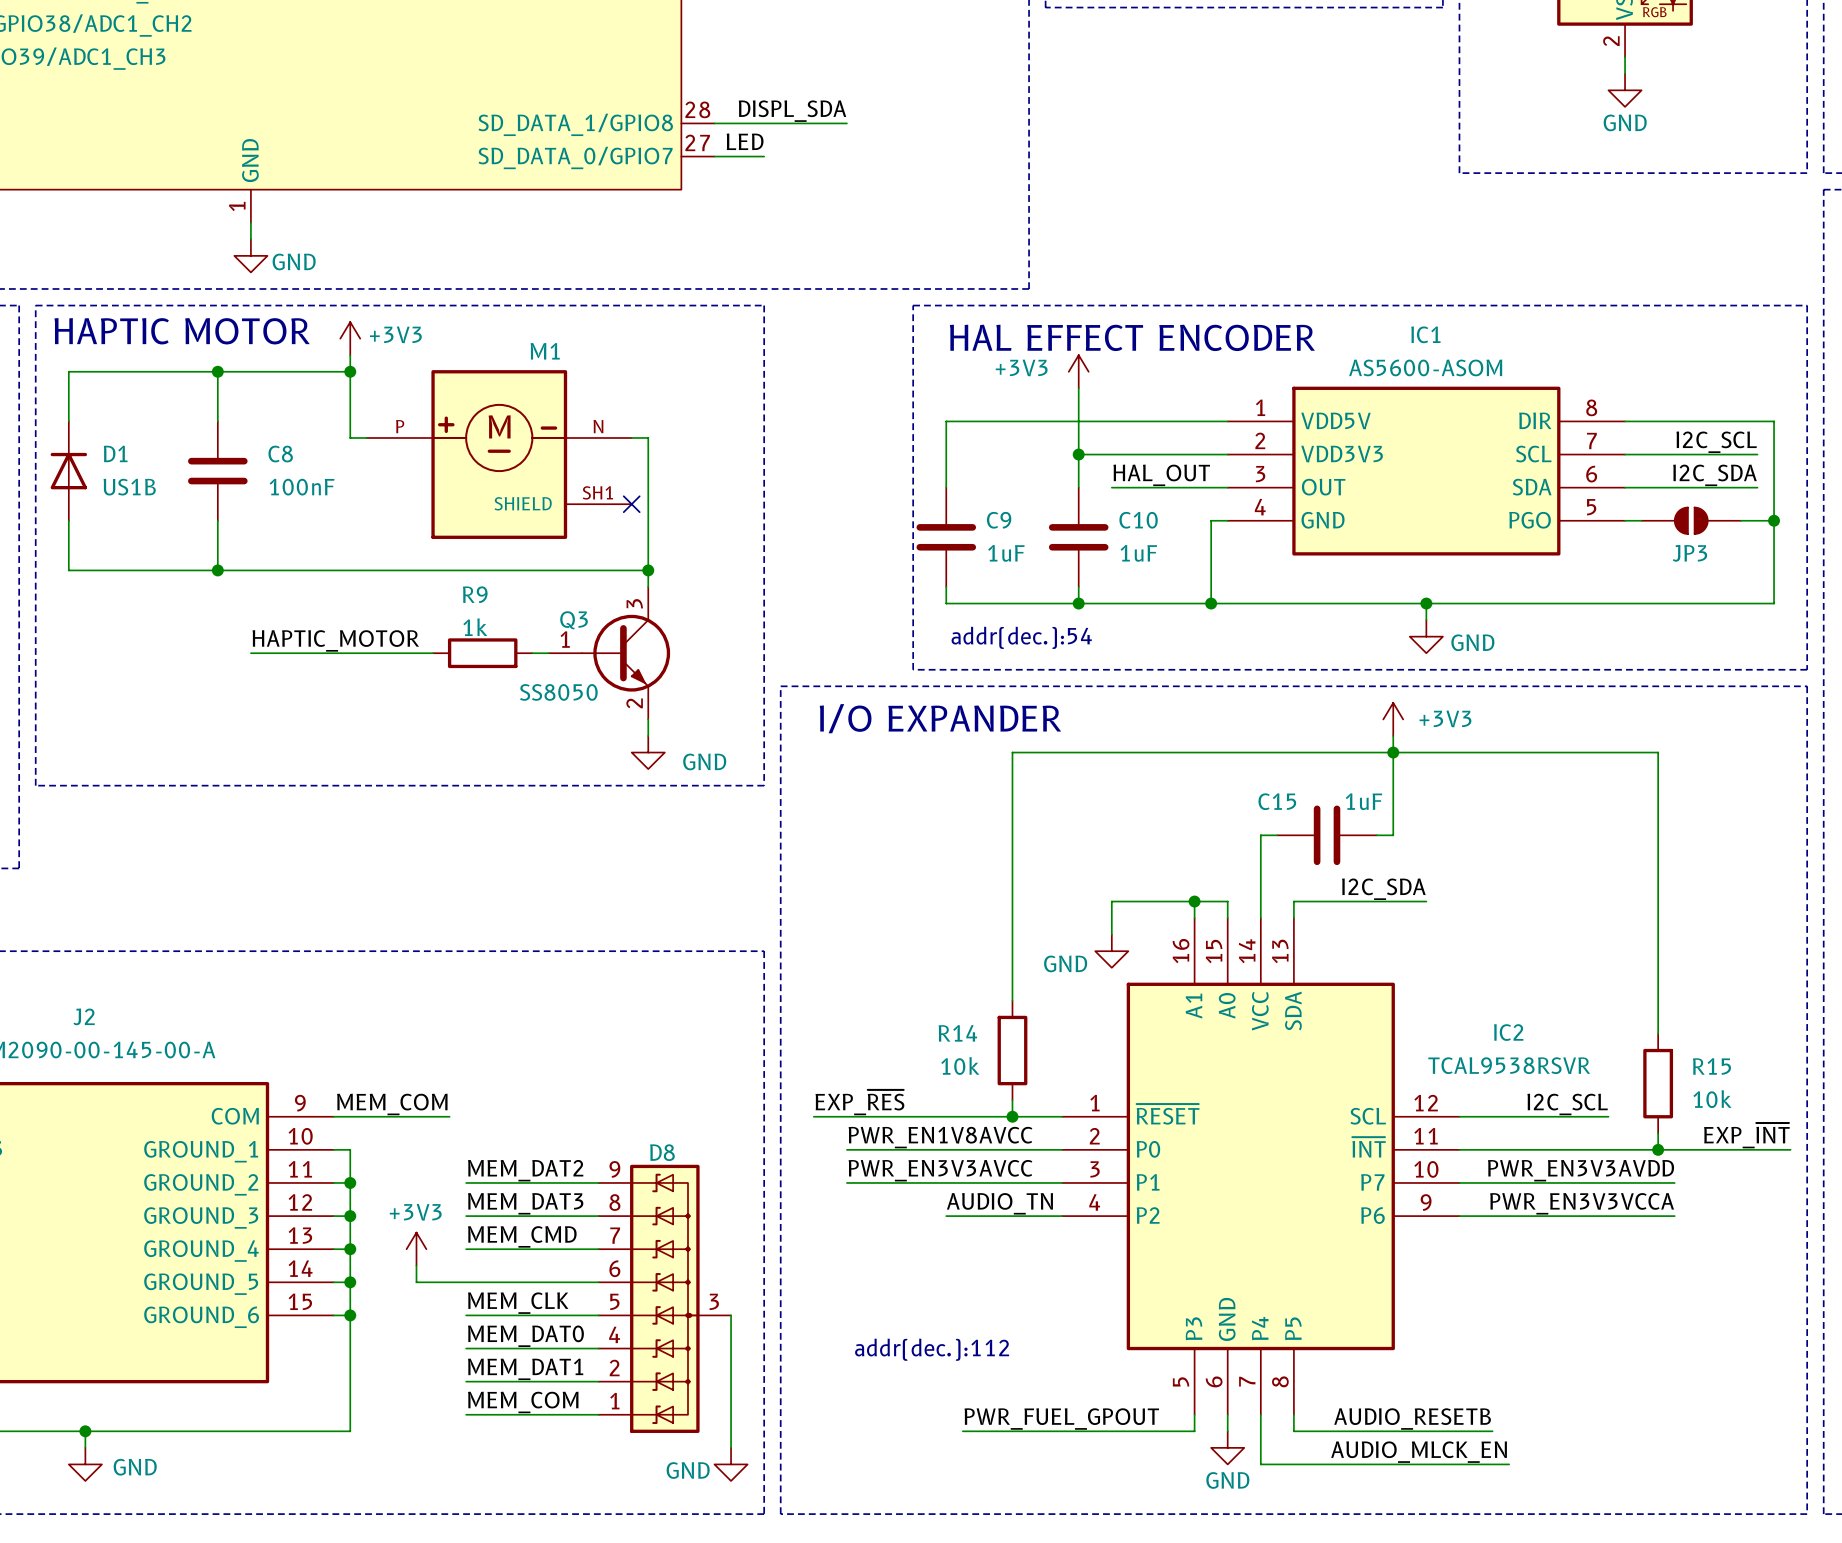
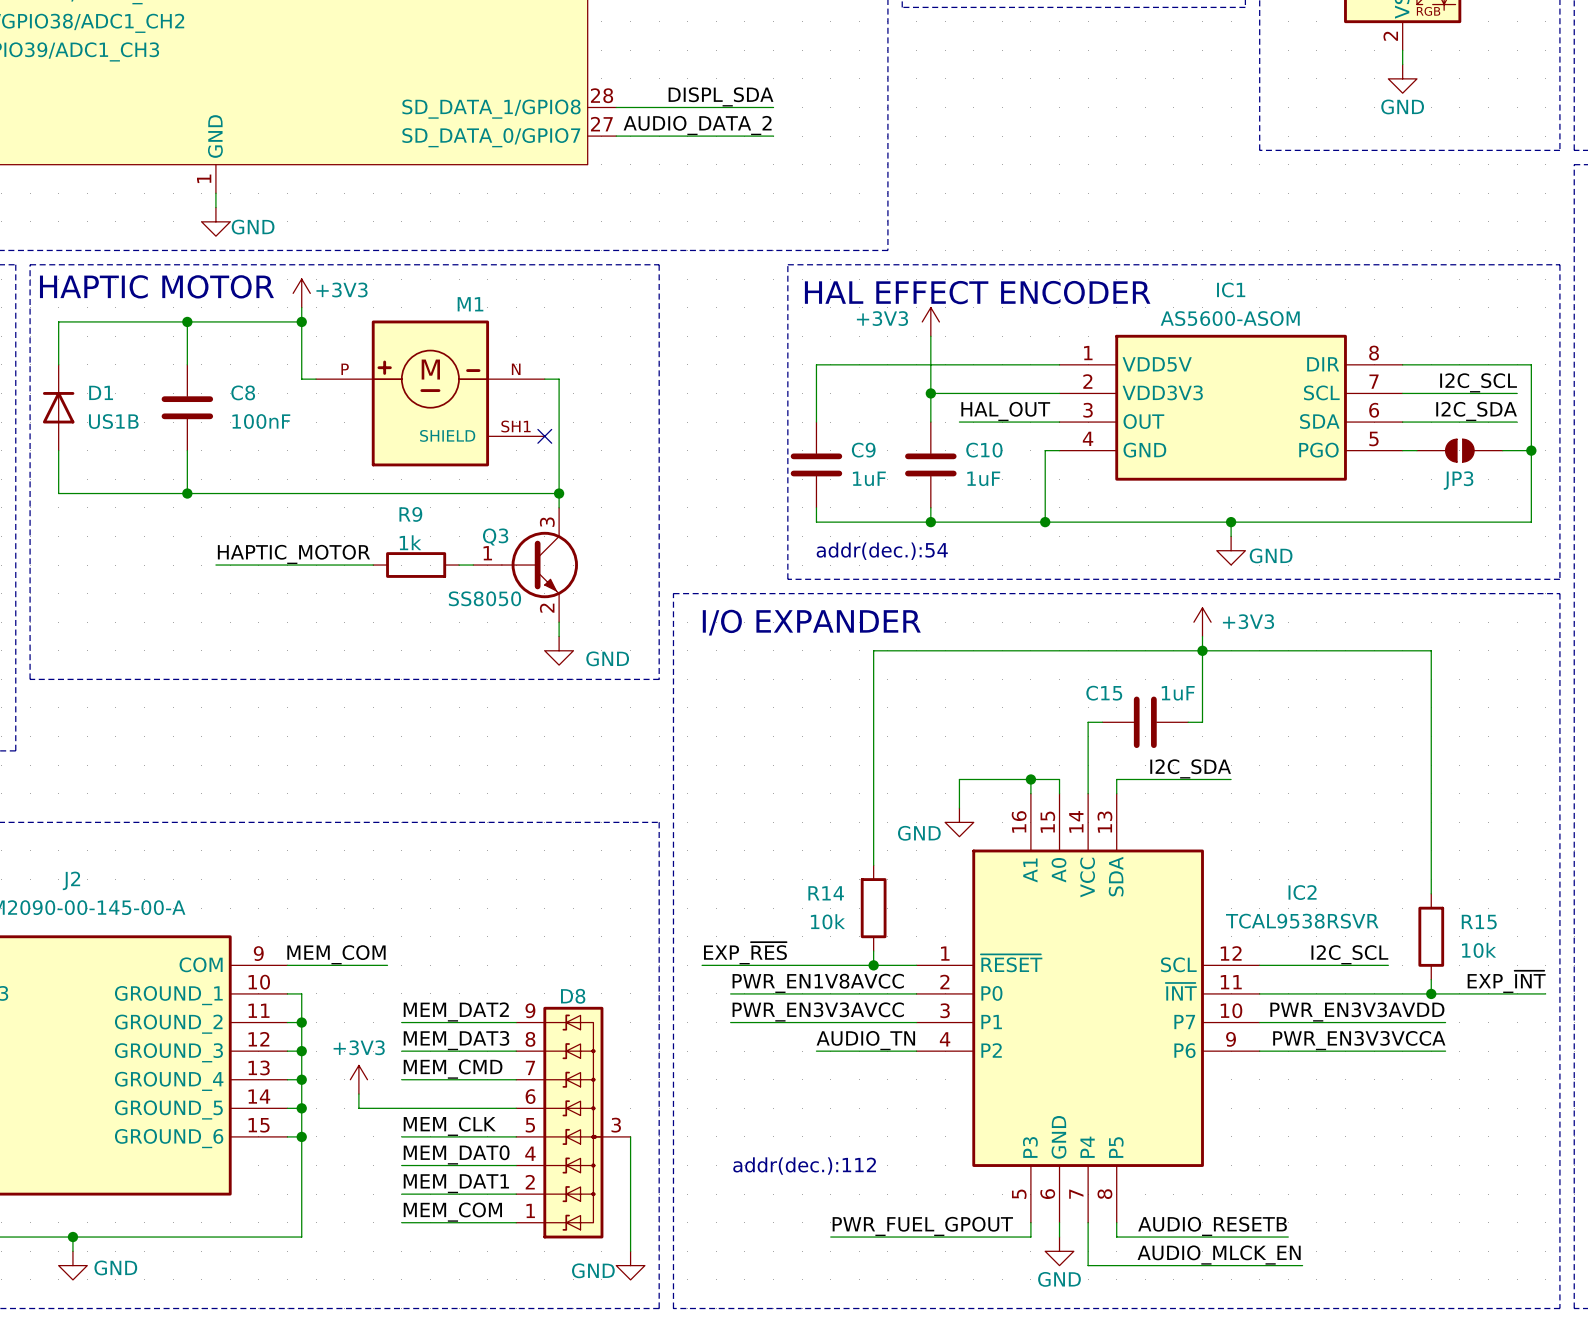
label position: DISPL_SDA (792, 111) -> DISPL_SDA (721, 96)
wire: none -> (730, 107) (773, 107)
label: LED (745, 141) -> none
label: none -> AUDIO_DATA_2 (697, 125)
wire: none -> (659, 136) (773, 136)

